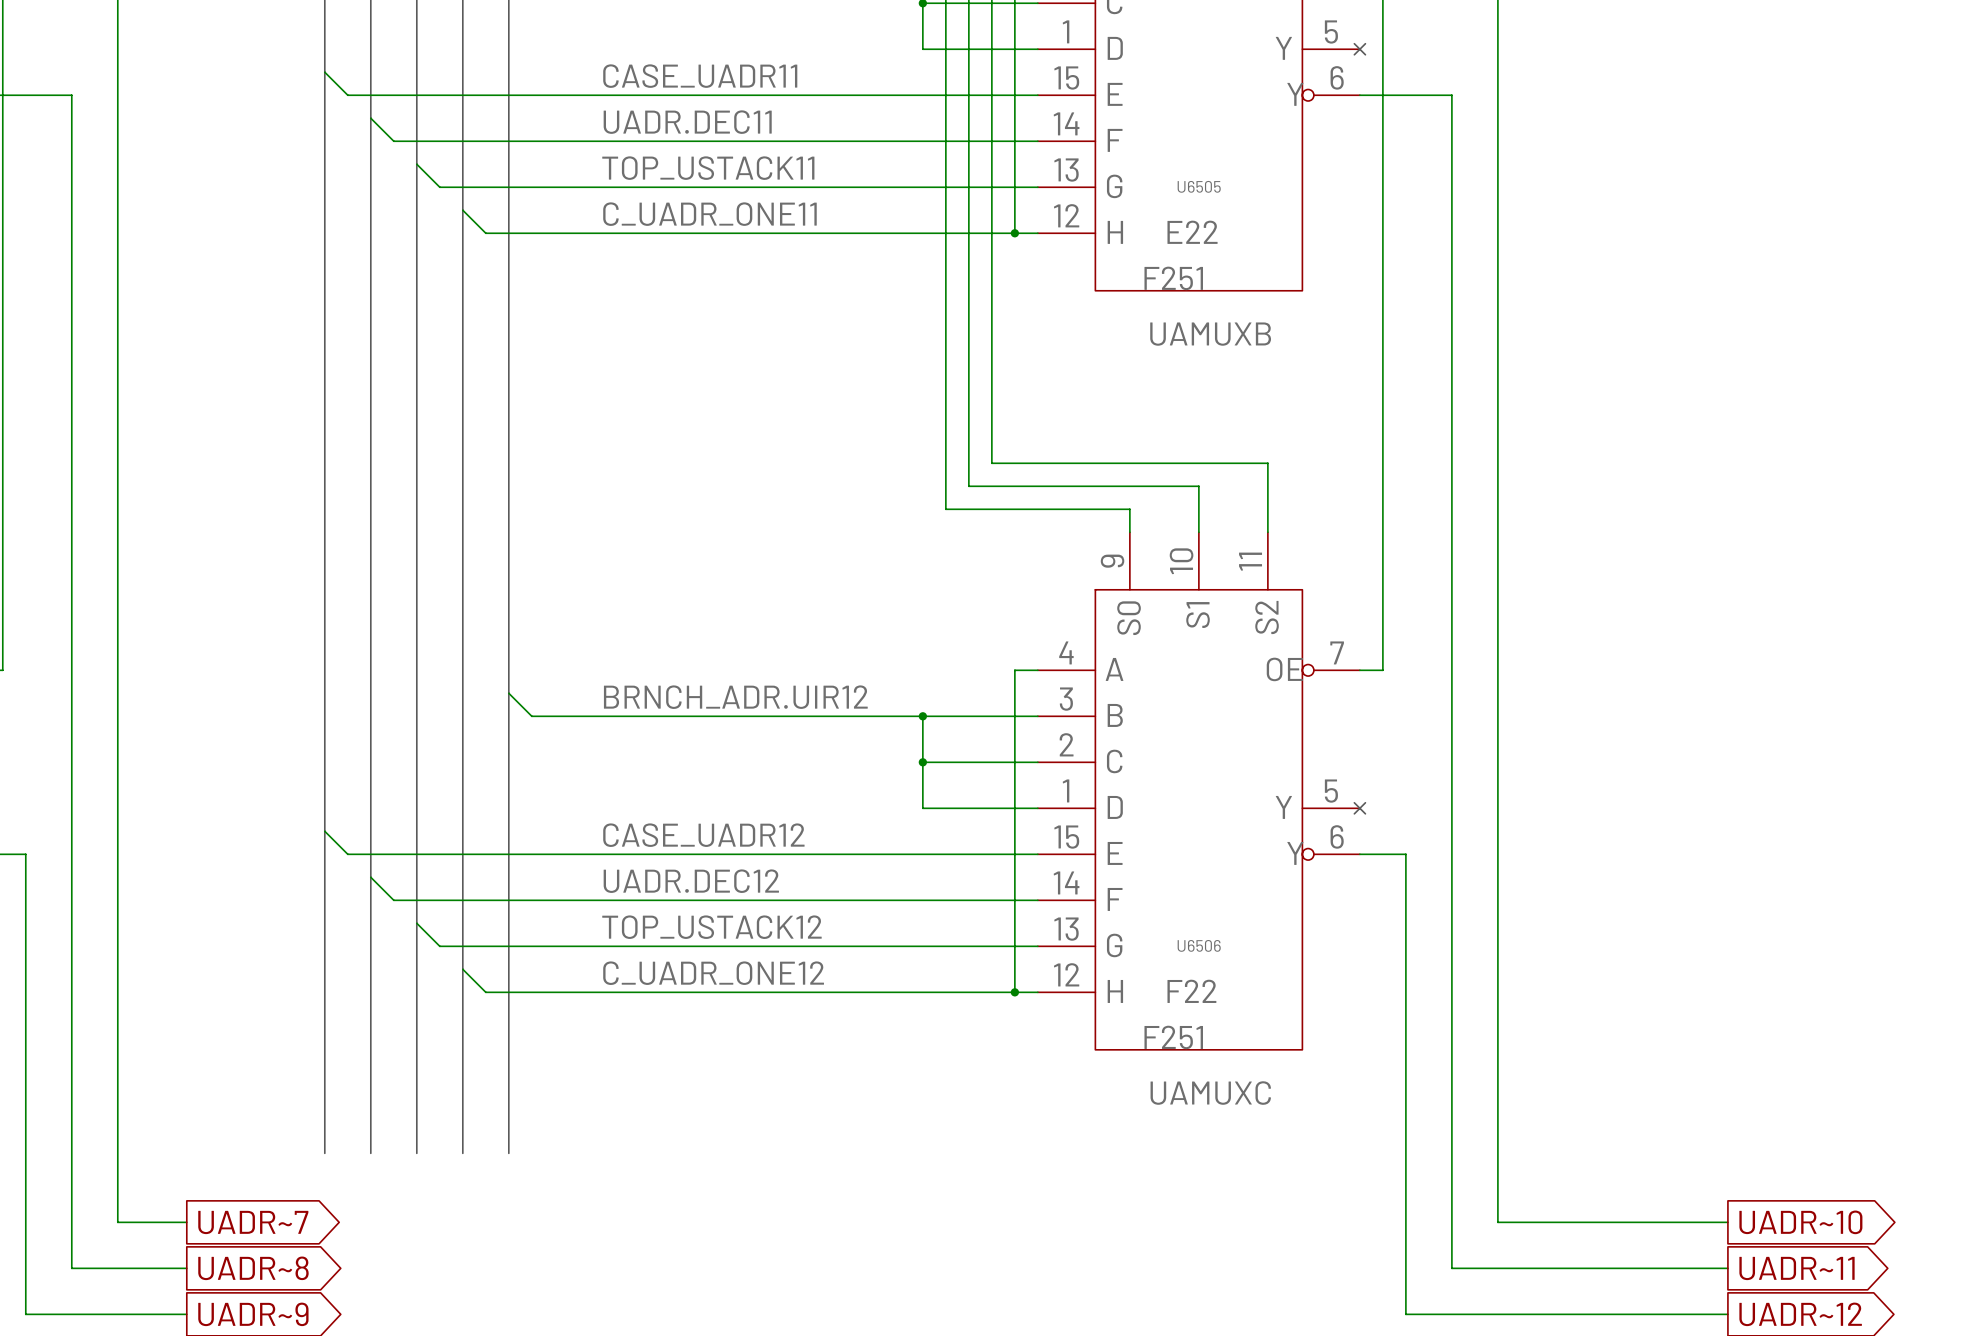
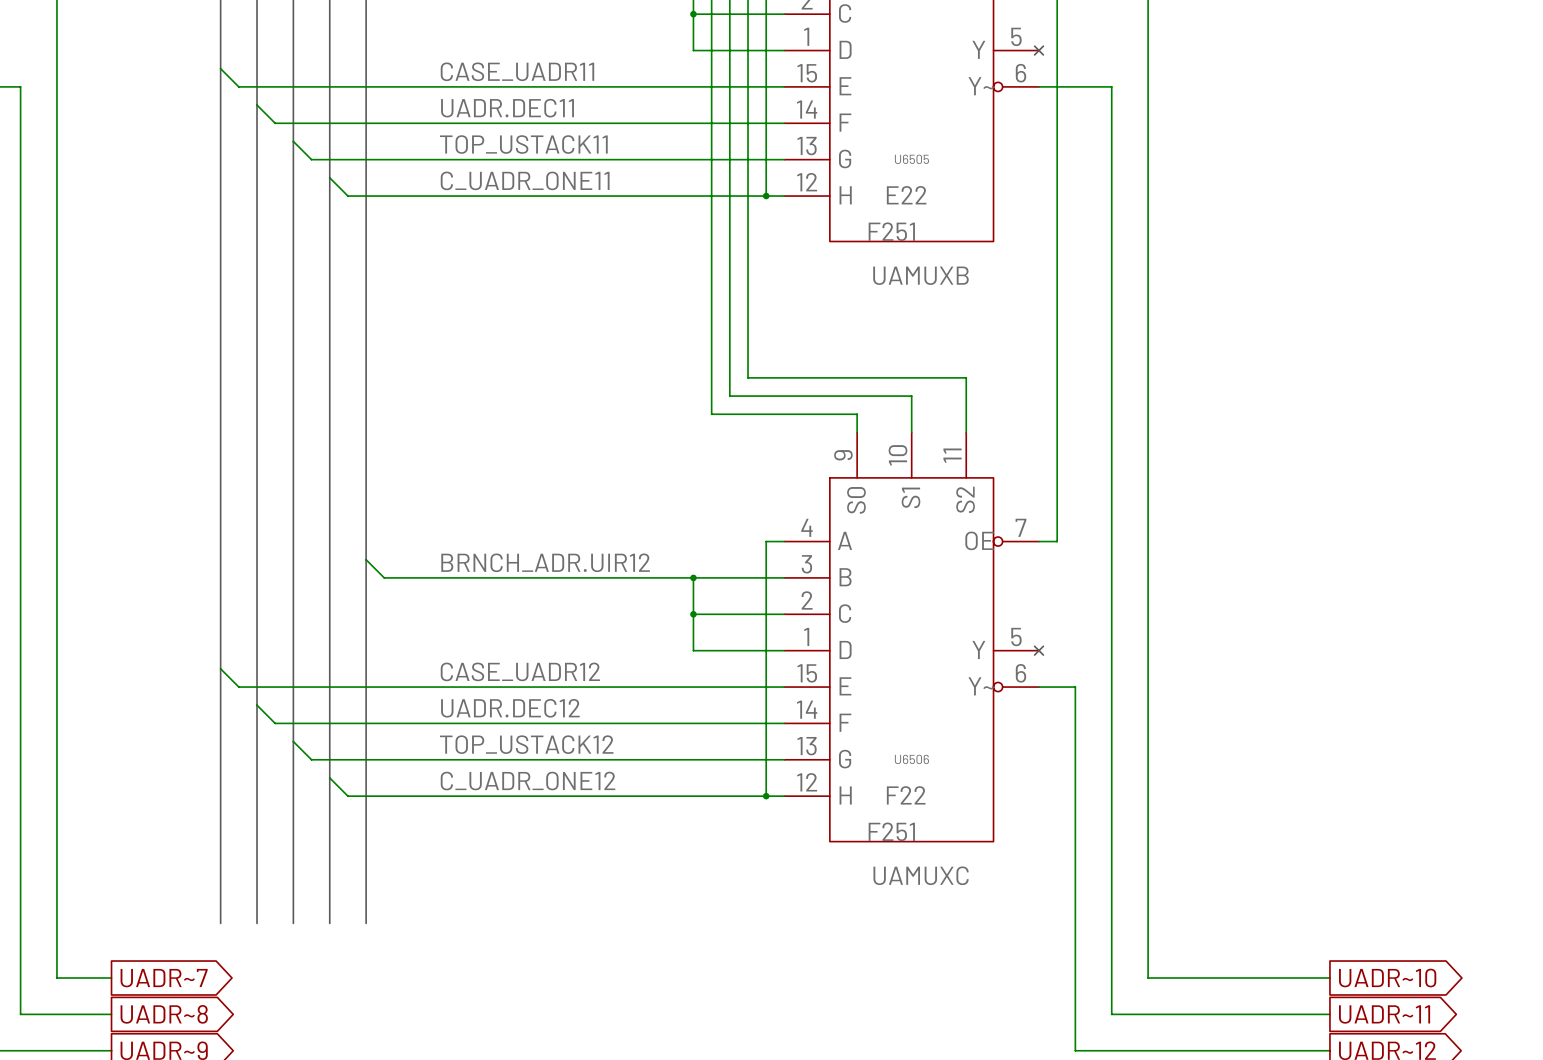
U6505 pin name: Y (1295, 94) -> Y~ (981, 86)
U6506 pin name: Y (1295, 853) -> Y~ (981, 686)

